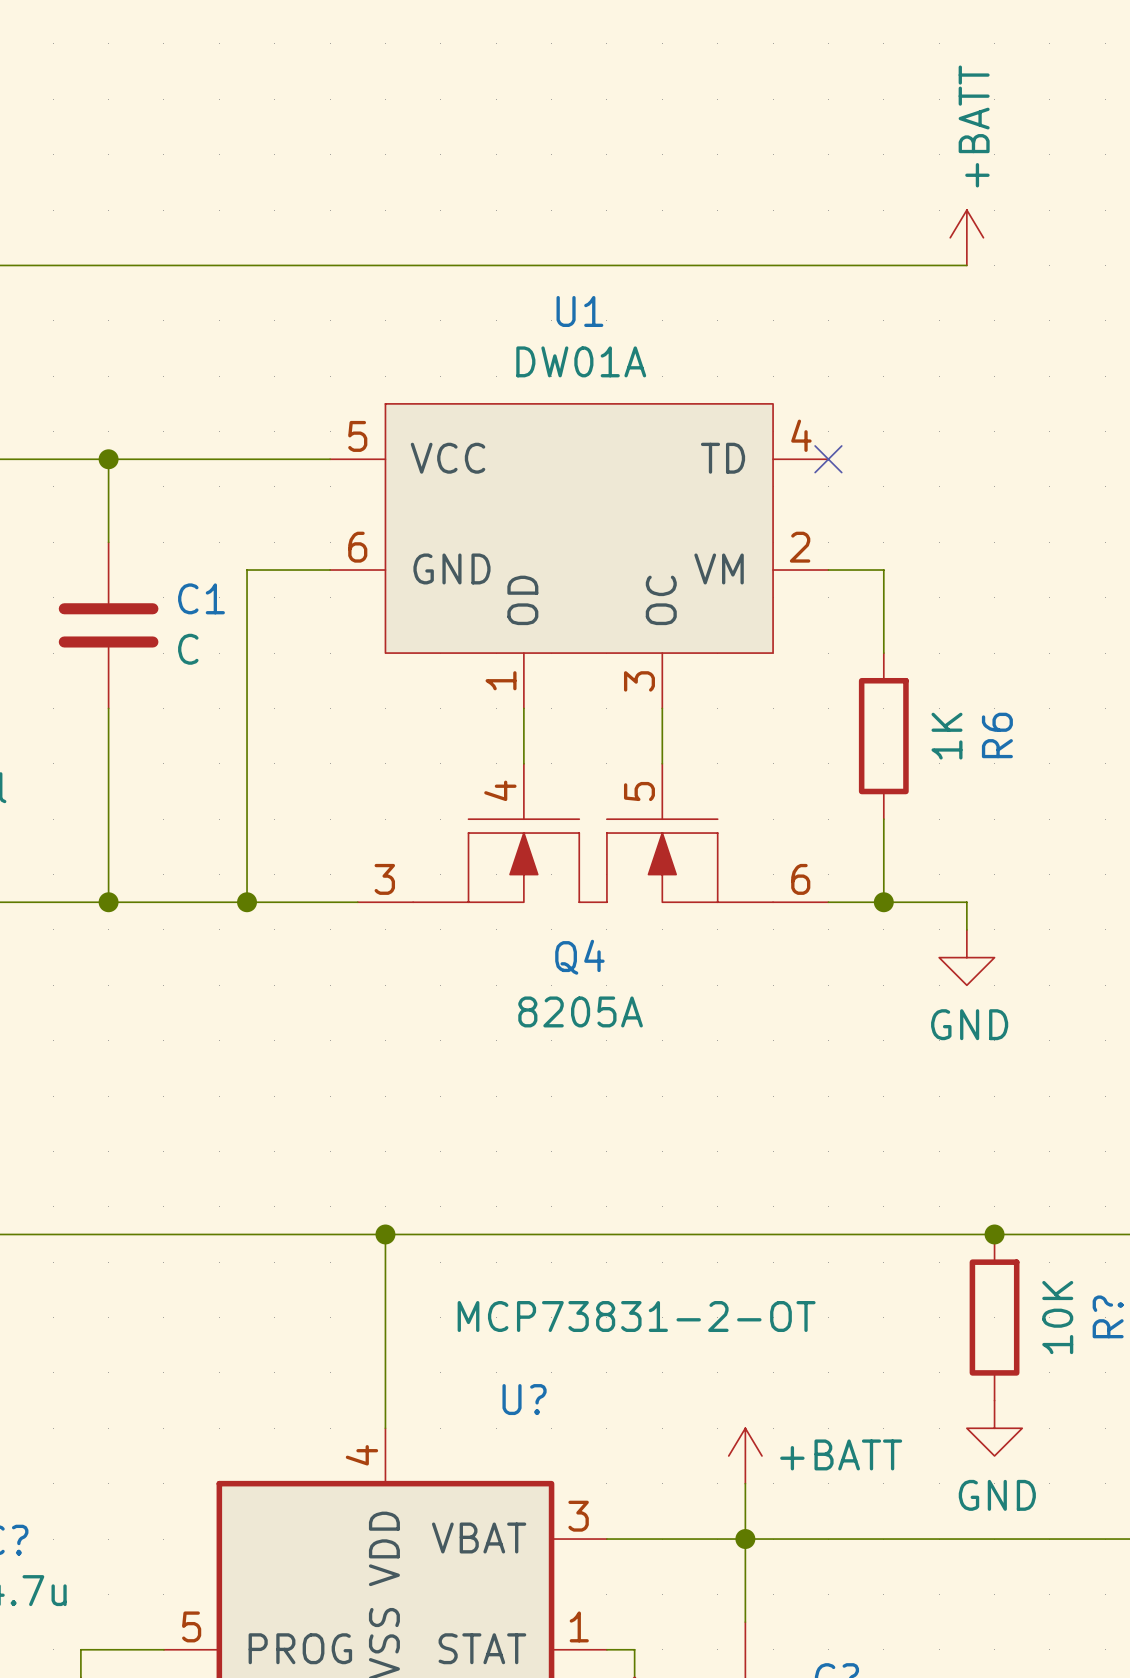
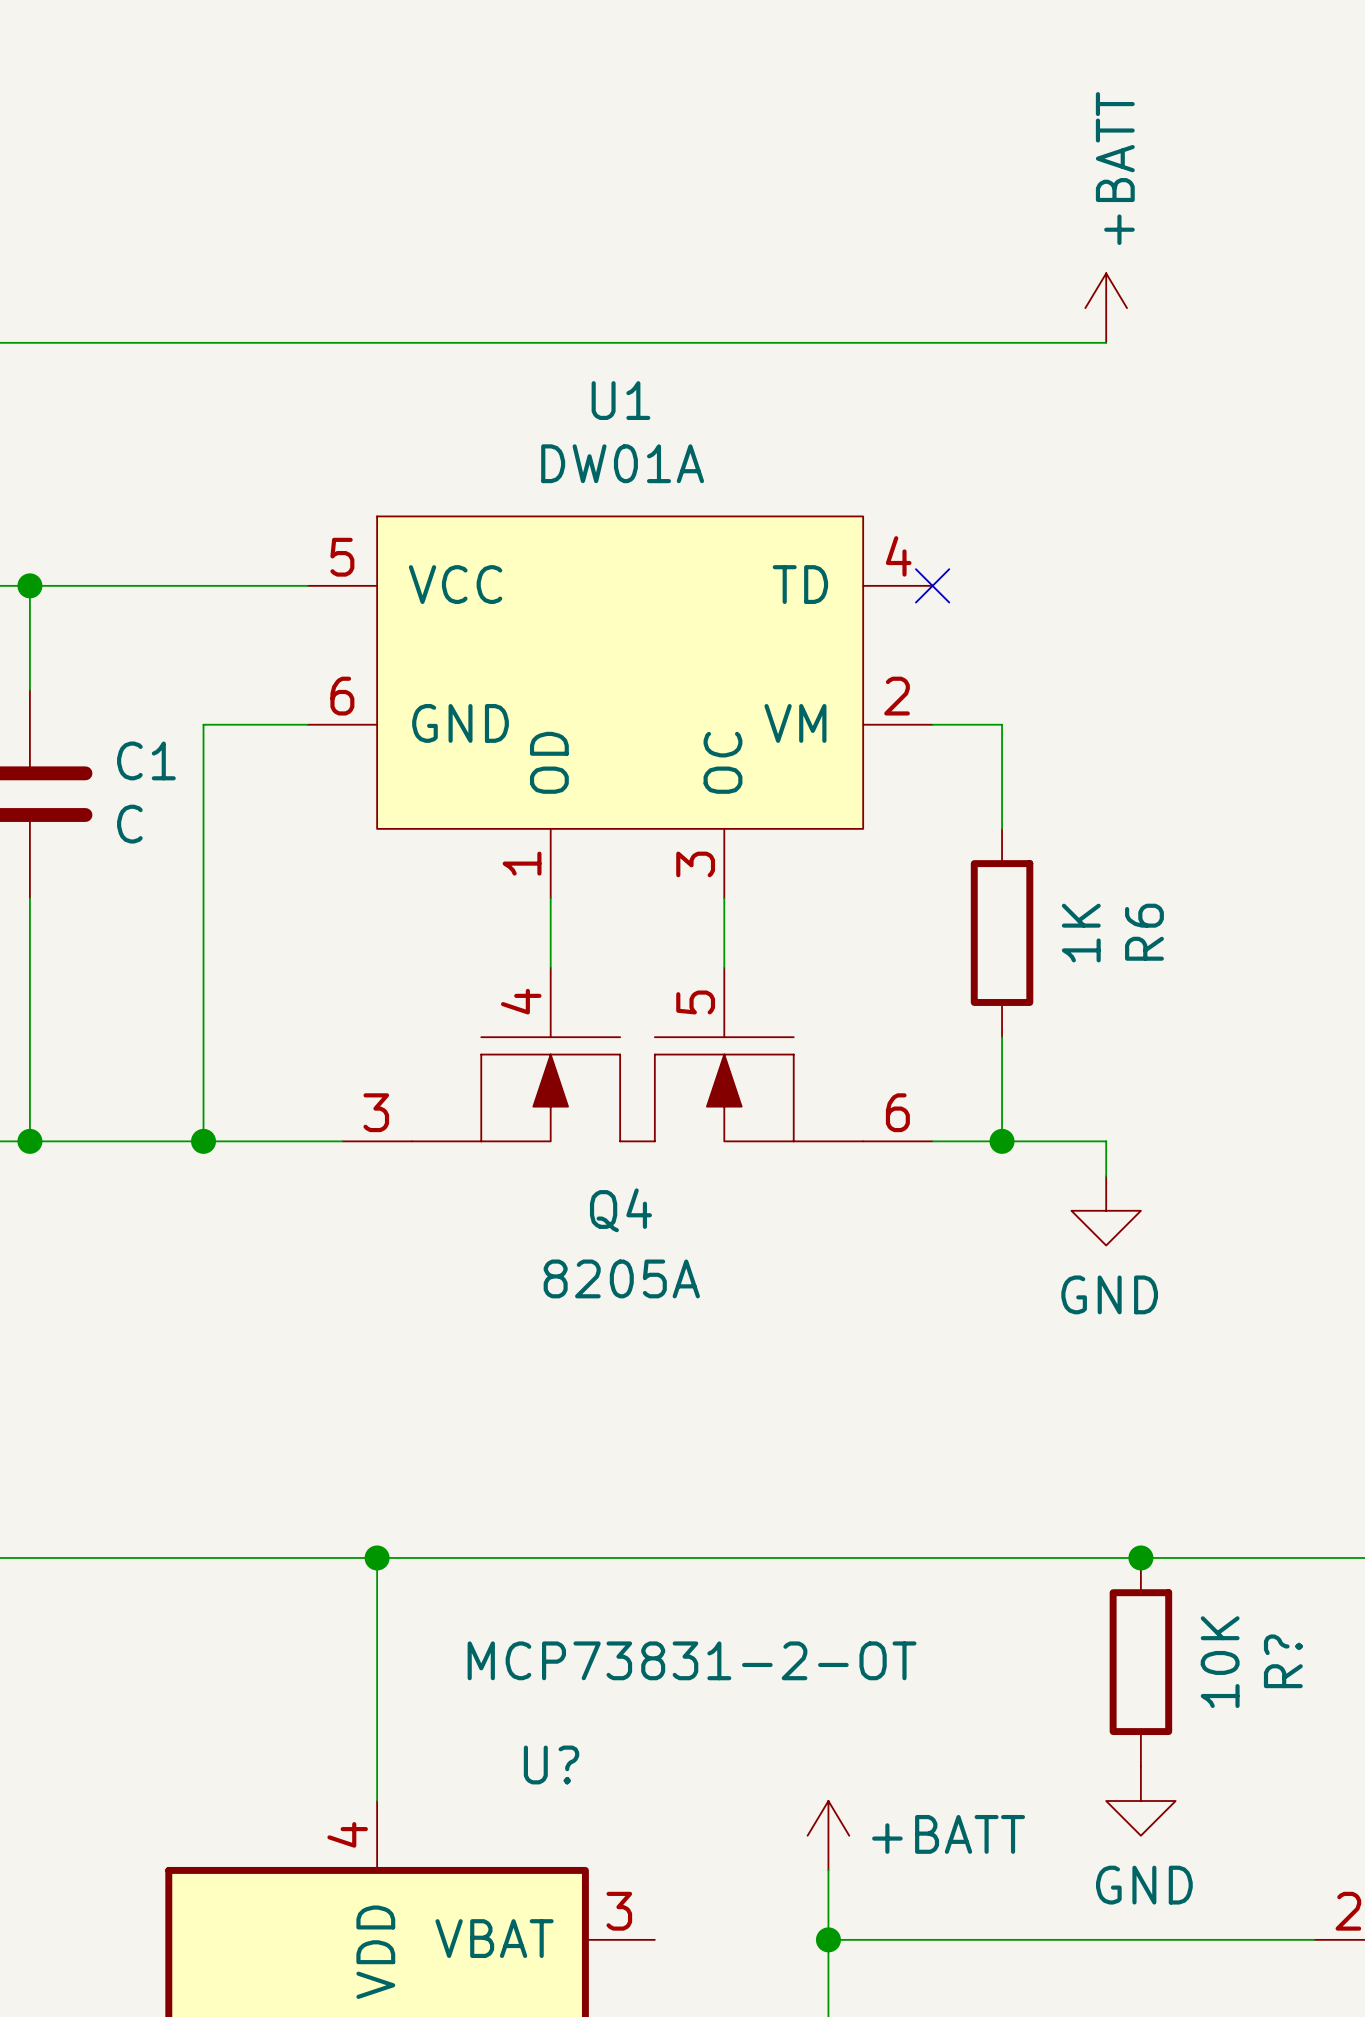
wire: (606, 1539) (745, 1539) -> none

